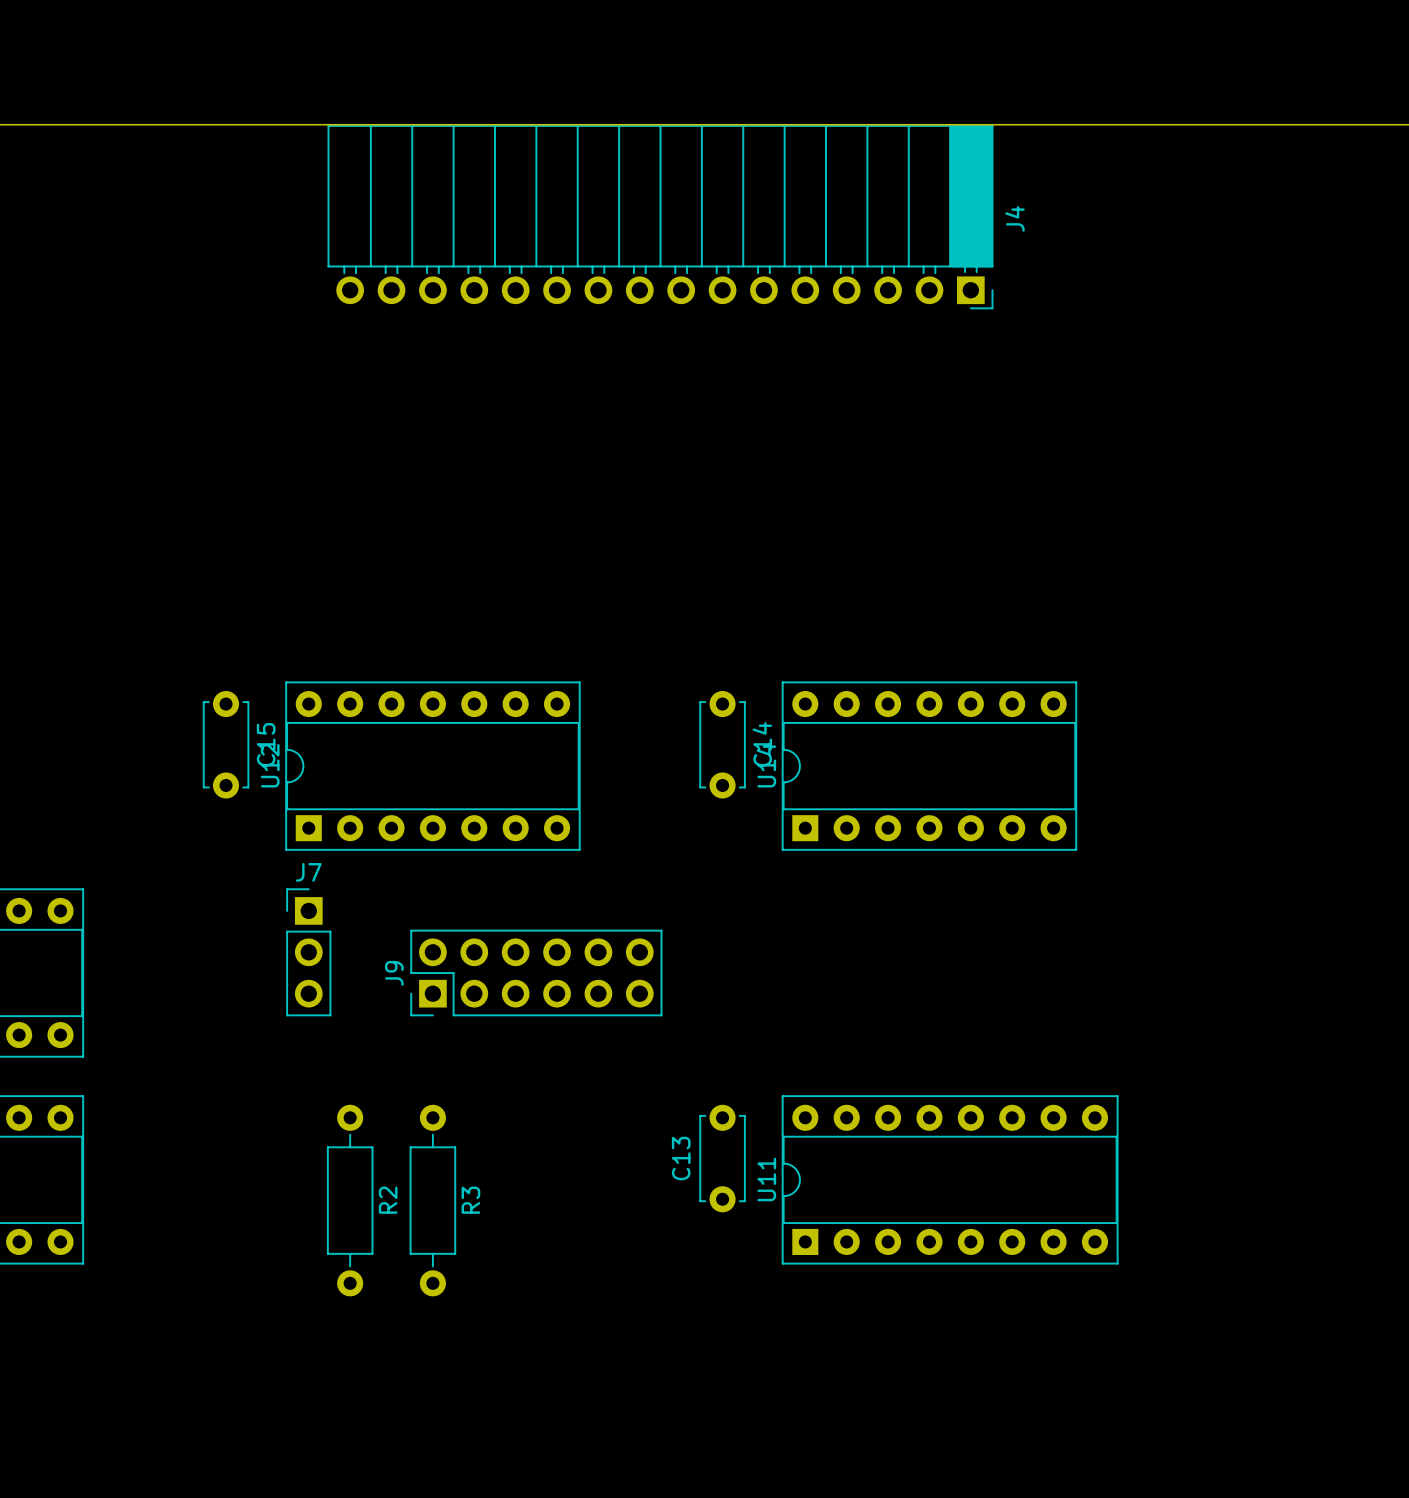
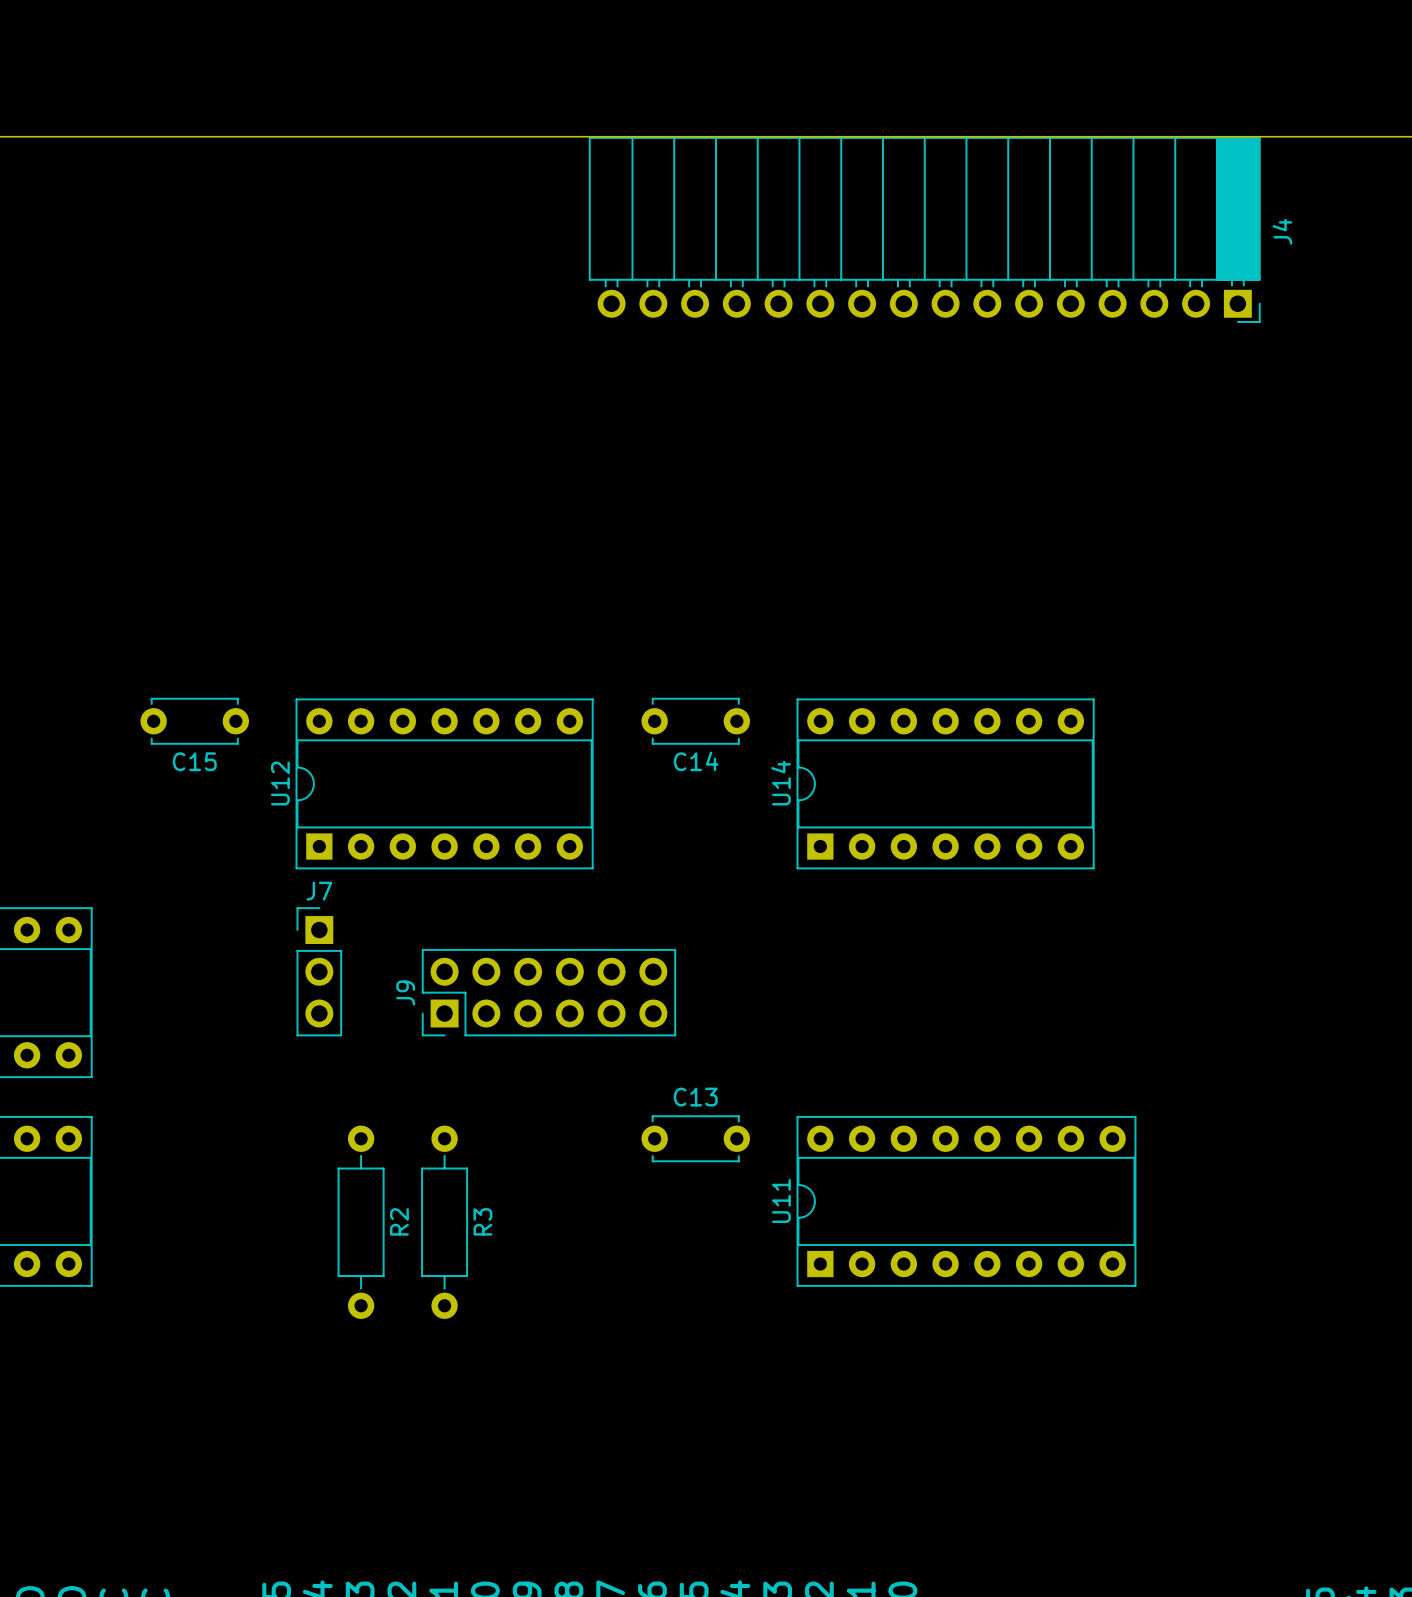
J4 position: (660, 217) -> (924, 229)
C15 rotation: 0° (226, 744) -> 90° clockwise (194, 721)
C14 rotation: 0° (722, 744) -> 90° clockwise (695, 721)
C13 rotation: 0° (722, 1158) -> 90° clockwise (695, 1138)

